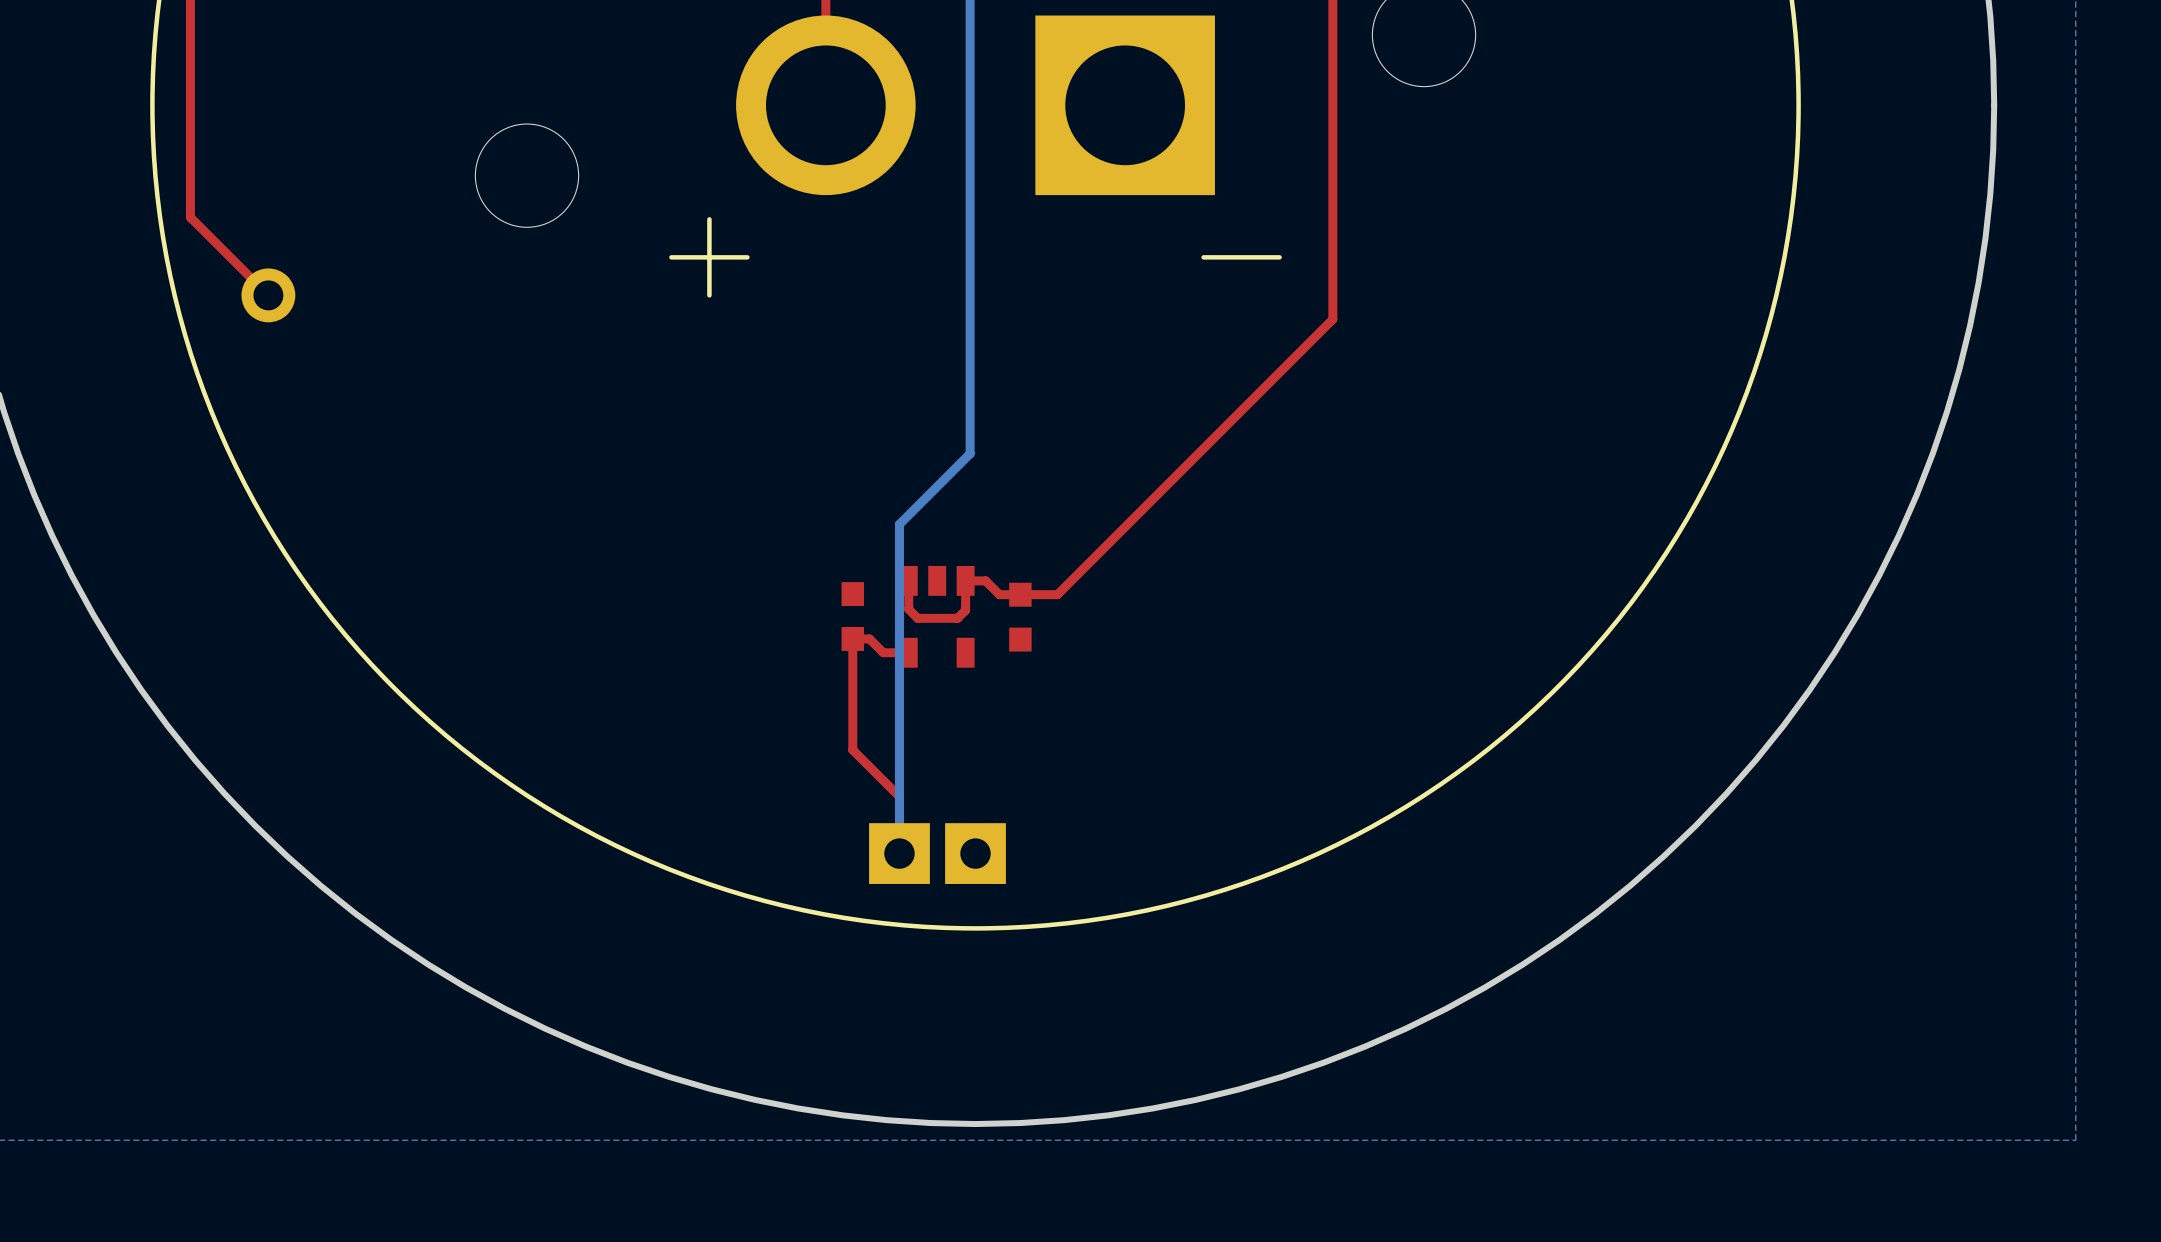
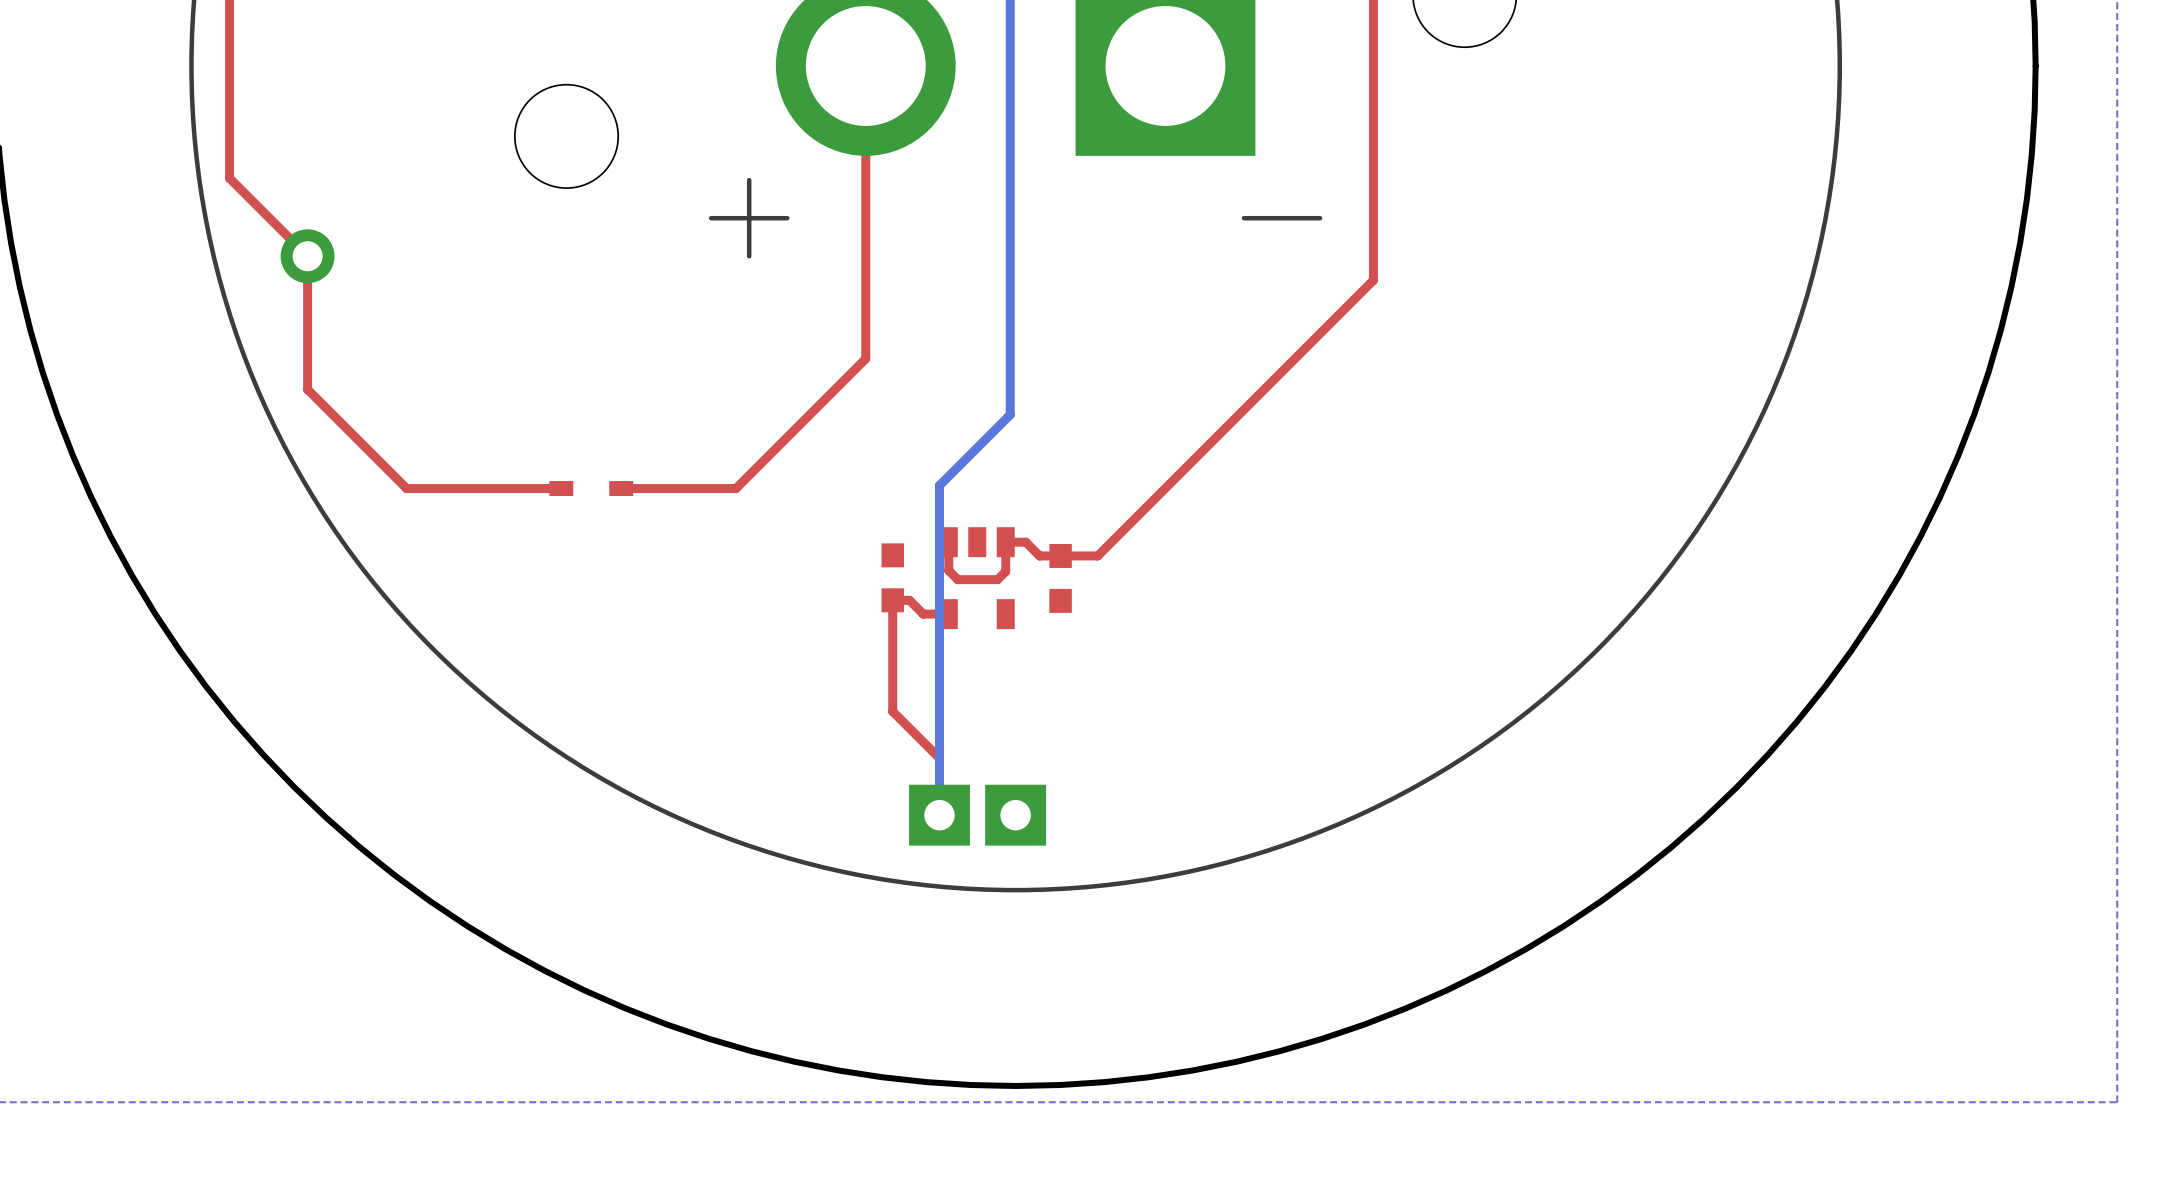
top track: none -> (865, 65) (865, 358) (736, 488) (621, 488)
top track: none -> (307, 256) (307, 389) (406, 488) (561, 488)
part: none -> (591, 488)

